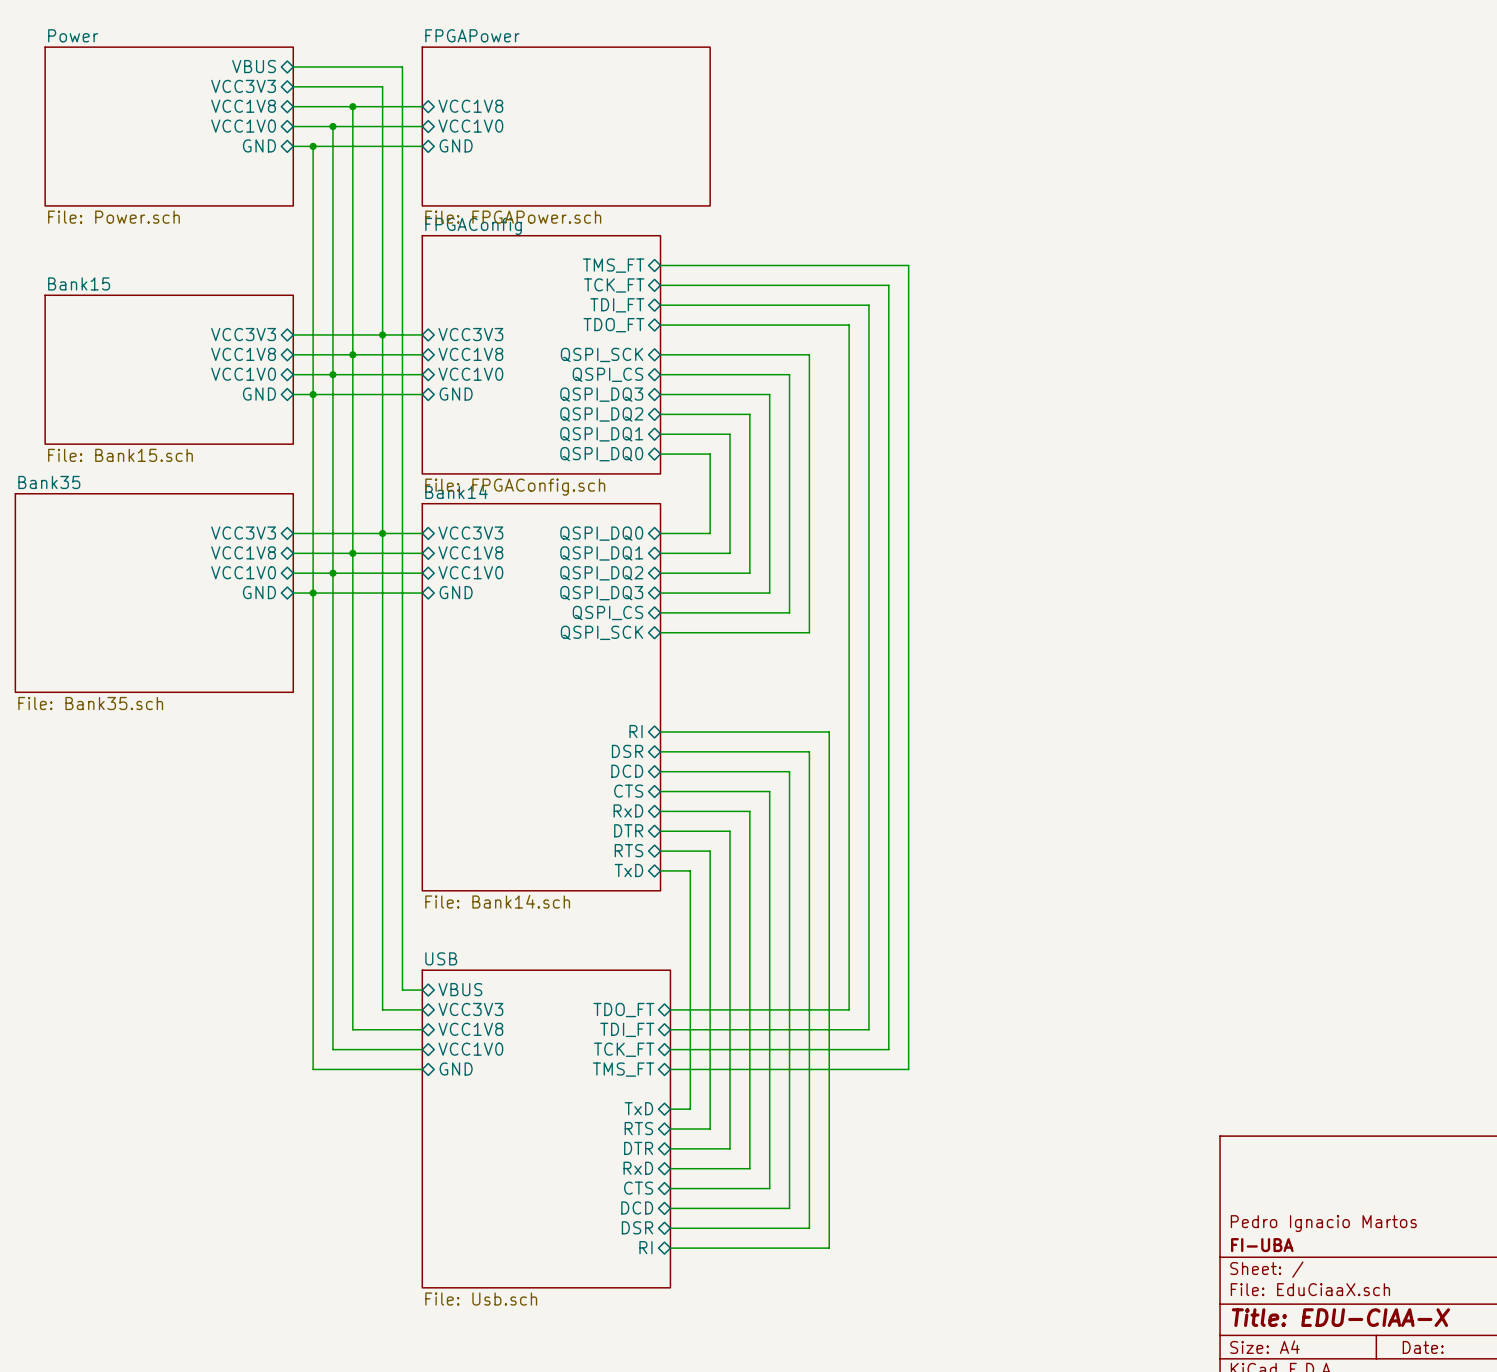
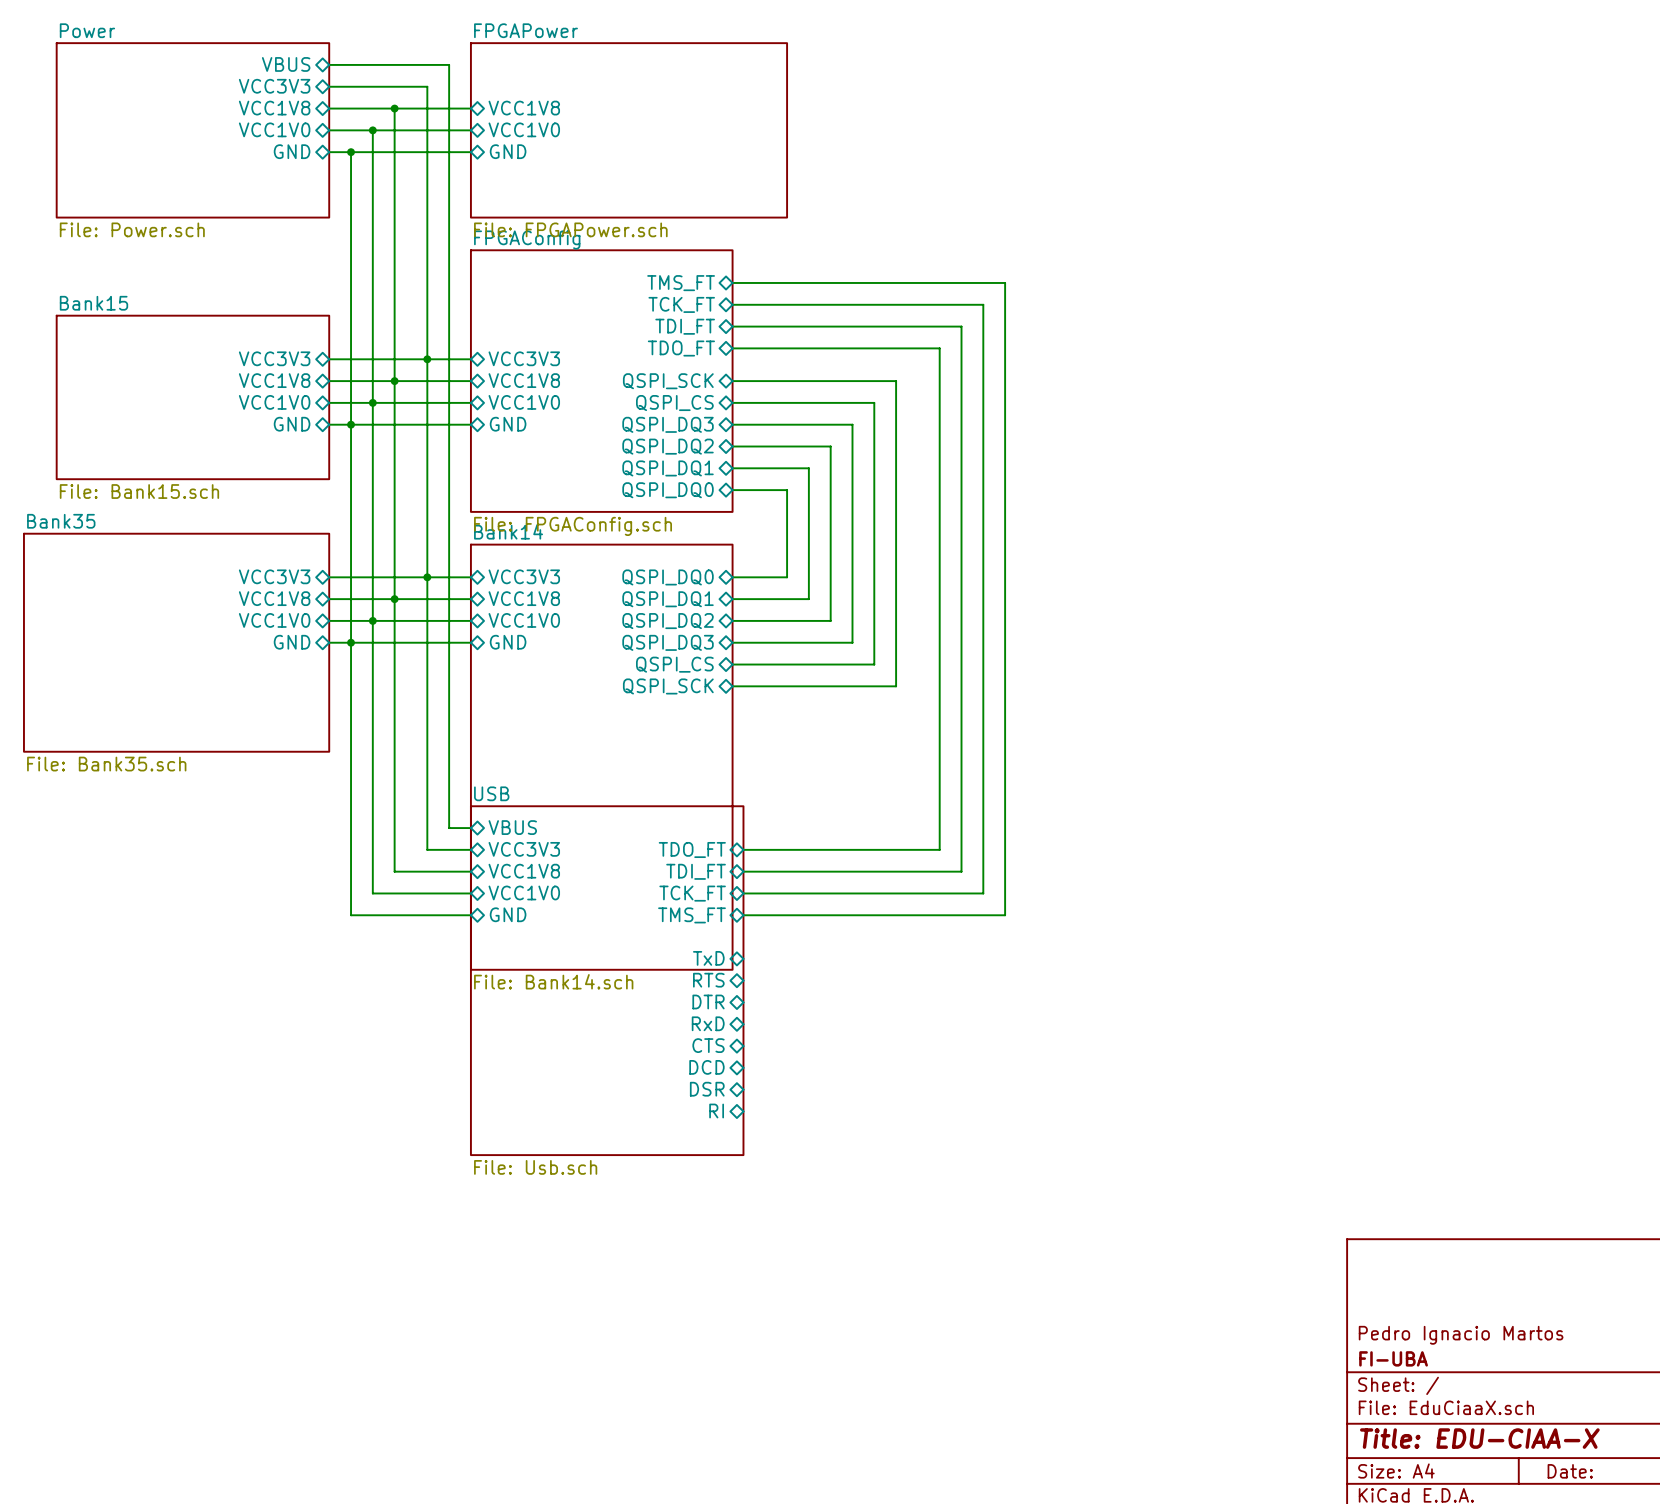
sheet pin: RI (636, 731) -> none
wire: (660, 731) (829, 731) (829, 1248) (670, 1248) -> none
sheet pin: DSR (627, 751) -> none
wire: (660, 751) (809, 751) (809, 1228) (670, 1228) -> none
wire: (402, 761) (402, 990) (422, 990) -> (449, 828) (470, 828)
sheet pin: none -> VBUS (512, 827)
sheet pin: DCD (627, 771) -> none
wire: (660, 771) (789, 771) (789, 1208) (670, 1208) -> none
wire: (382, 781) (382, 1009) (422, 1009) -> (427, 849) (470, 849)
sheet pin: none -> VCC3V3 (524, 849)
sheet pin: none -> TDO_FT (692, 849)
wire: (849, 781) (849, 1009) (670, 1009) -> (939, 849) (743, 849)
sheet pin: CTS (628, 791) -> none
wire: (660, 791) (769, 791) (769, 1188) (670, 1188) -> none
wire: (352, 801) (352, 1029) (422, 1029) -> (394, 871) (470, 871)
sheet pin: none -> VCC1V8 (524, 871)
sheet pin: none -> TDI_FT (696, 871)
wire: (868, 801) (868, 1029) (670, 1029) -> (961, 871) (743, 871)
sheet pin: RxD (628, 810) -> none
wire: (660, 811) (749, 811) (749, 1168) (670, 1168) -> none
sheet pin: none -> VCC1V0 (524, 892)
wire: (332, 821) (332, 1049) (422, 1049) -> (372, 893) (470, 893)
sheet pin: none -> TCK_FT (692, 893)
wire: (888, 821) (888, 1049) (670, 1049) -> (983, 893) (743, 893)
sheet pin position: DTR (628, 830) -> DTR (708, 1001)
wire: (660, 831) (729, 831) (729, 1148) (670, 1148) -> none
sheet pin: none -> GND (508, 914)
wire: (313, 841) (313, 1069) (422, 1069) -> (351, 915) (470, 915)
sheet pin: none -> TMS_FT (692, 915)
wire: (908, 841) (908, 1069) (670, 1069) -> (1005, 915) (743, 915)
sheet pin position: RTS (628, 850) -> RTS (708, 980)
wire: (660, 851) (710, 851) (710, 1129) (670, 1129) -> none
sheet pin position: TxD (628, 870) -> TxD (708, 958)
wire: (660, 870) (690, 870) (690, 1109) (670, 1109) -> none
sheet USB: none -> File: Usb.sch (607, 980)
sheet pin: none -> RxD (708, 1023)
sheet pin: none -> CTS (708, 1045)
sheet pin: none -> DCD (706, 1067)
sheet pin: VBUS (460, 989) -> none
sheet pin: none -> DSR (707, 1089)
sheet pin: VCC3V3 (470, 1009) -> none
sheet pin: TDO_FT (623, 1010) -> none
sheet pin: none -> RI (716, 1111)
sheet pin: VCC1V8 (470, 1029) -> none
sheet pin: TDI_FT (627, 1029) -> none
sheet pin: VCC1V0 (470, 1049) -> none
sheet pin: TCK_FT (624, 1049) -> none
sheet pin: GND (456, 1069) -> none
sheet pin: TMS_FT (623, 1069) -> none
sheet pin: TxD (638, 1108) -> none
sheet pin: RTS (638, 1128) -> none
sheet USB: File: Usb.sch (546, 1129) -> none
sheet pin: DTR (638, 1148) -> none
sheet pin: RxD (638, 1168) -> none
sheet pin: CTS (638, 1188) -> none
sheet pin: DCD (637, 1207) -> none
sheet pin: DSR (637, 1227) -> none
sheet pin: RI (645, 1247) -> none

